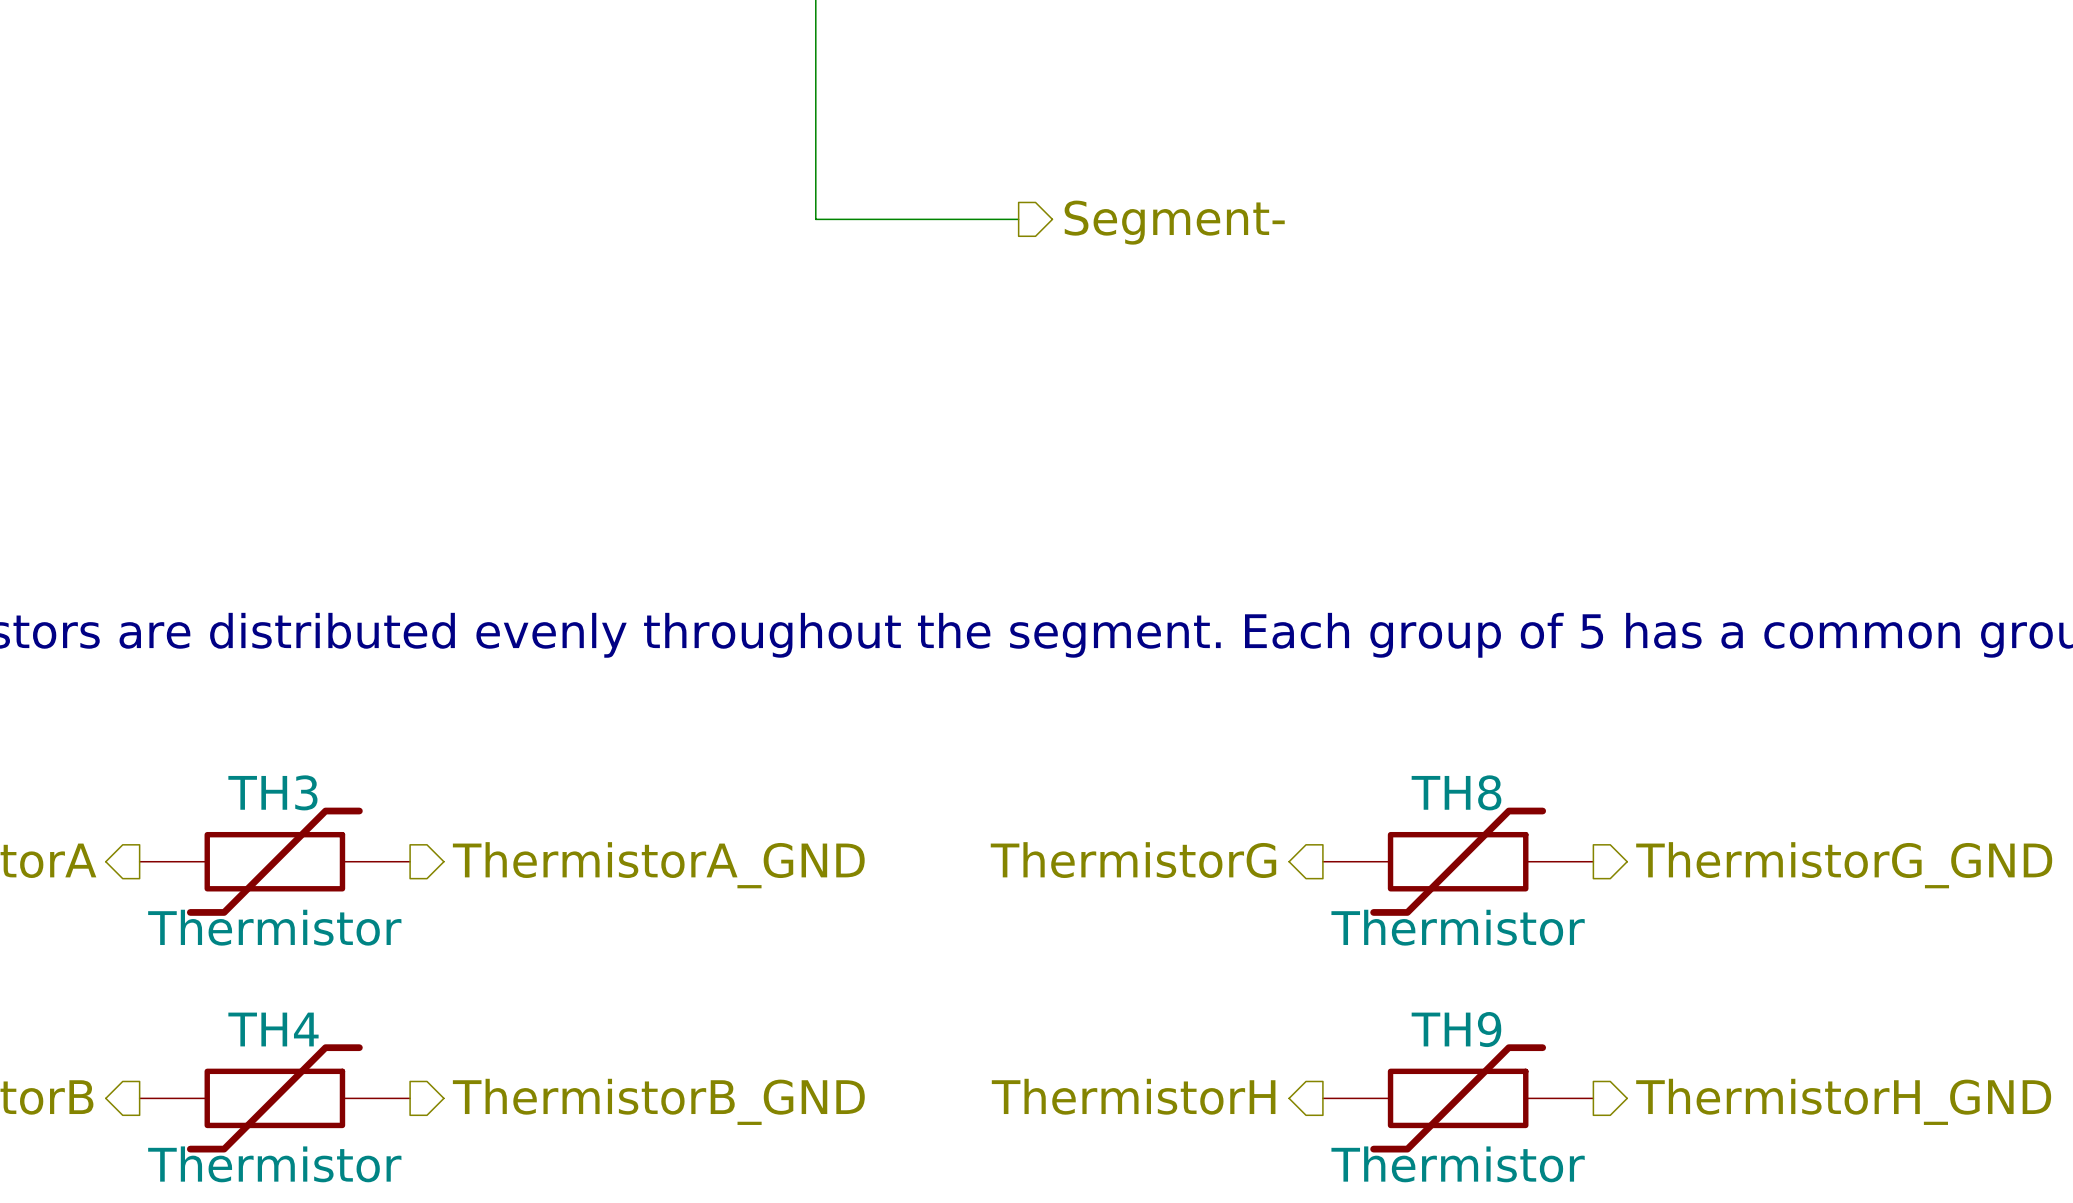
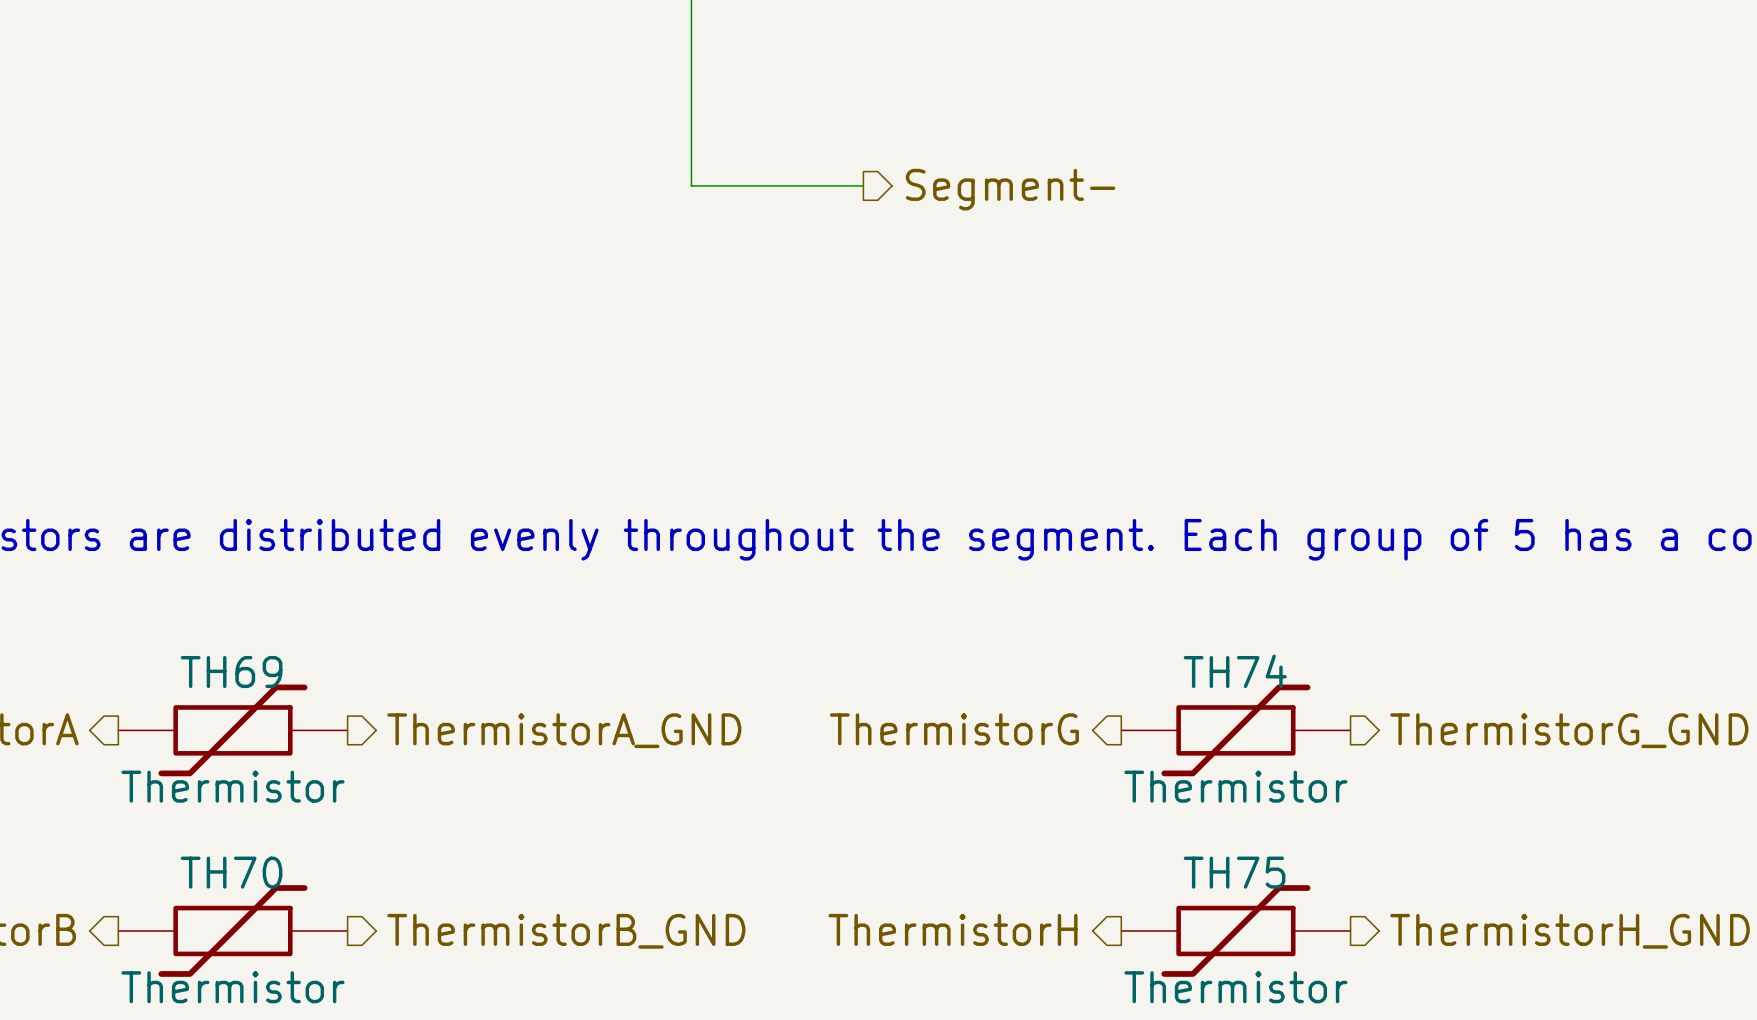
TH3 name: TH3 (272, 792) -> TH69 (231, 672)
TH8 name: TH8 (1456, 792) -> TH74 (1235, 671)
TH4 name: TH4 (273, 1029) -> TH70 (231, 872)
TH9 name: TH9 (1456, 1029) -> TH75 (1234, 872)

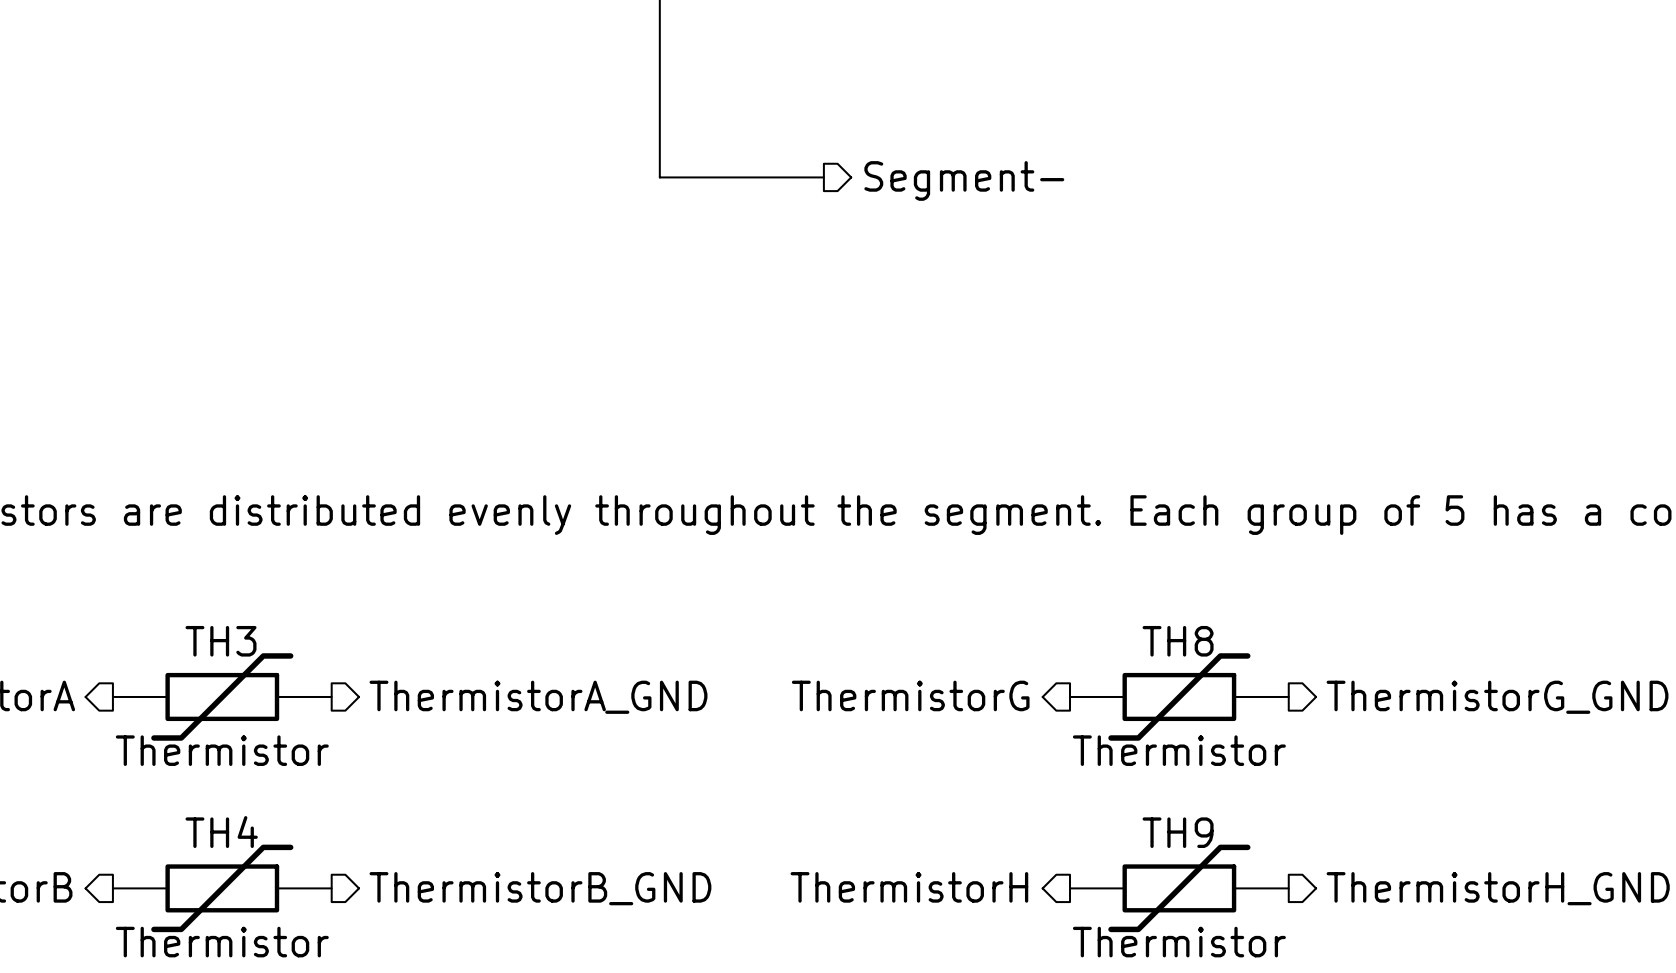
TH74 name: TH74 (1235, 671) -> TH8 (1178, 641)
TH69 name: TH69 (231, 672) -> TH3 (221, 641)
TH70 name: TH70 (231, 872) -> TH4 (221, 832)
TH75 name: TH75 (1234, 872) -> TH9 (1178, 832)

